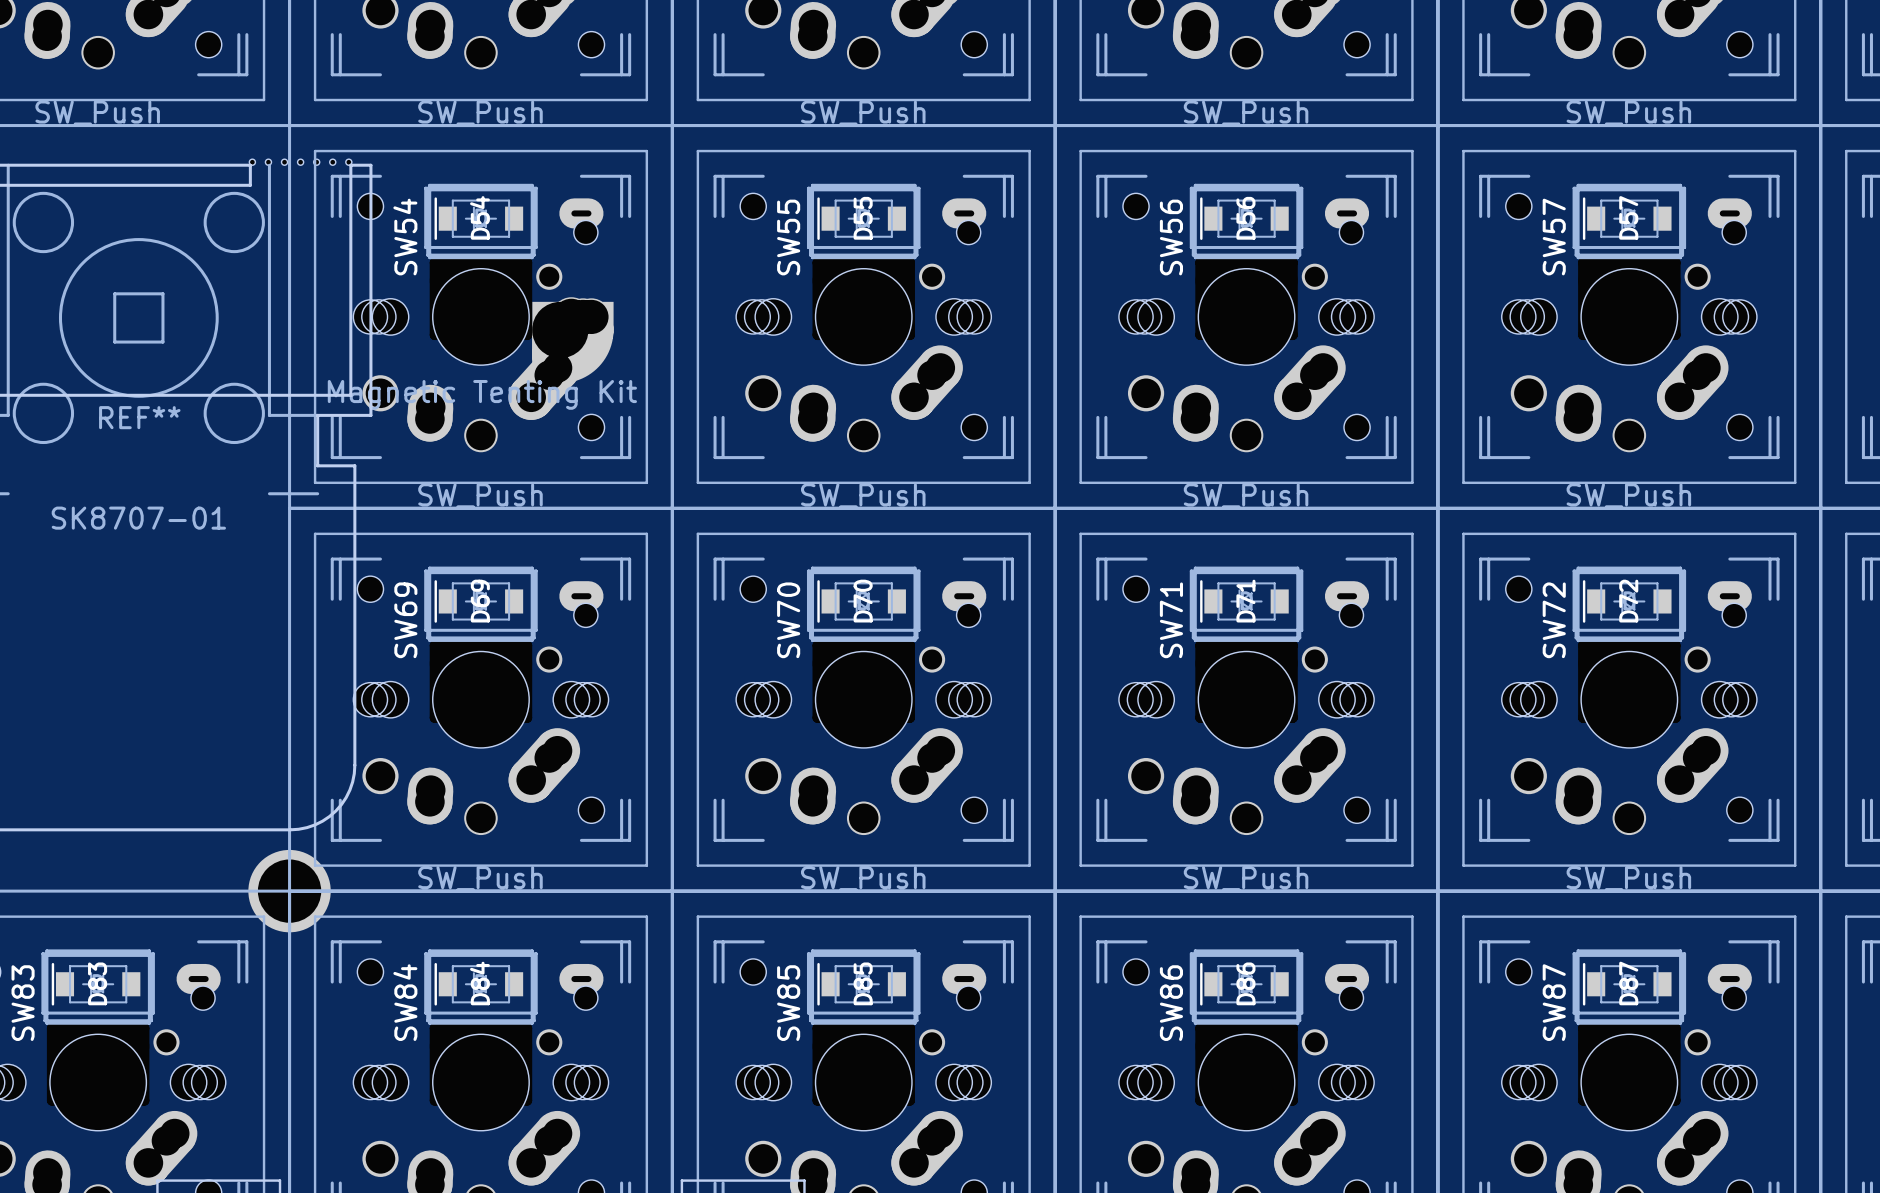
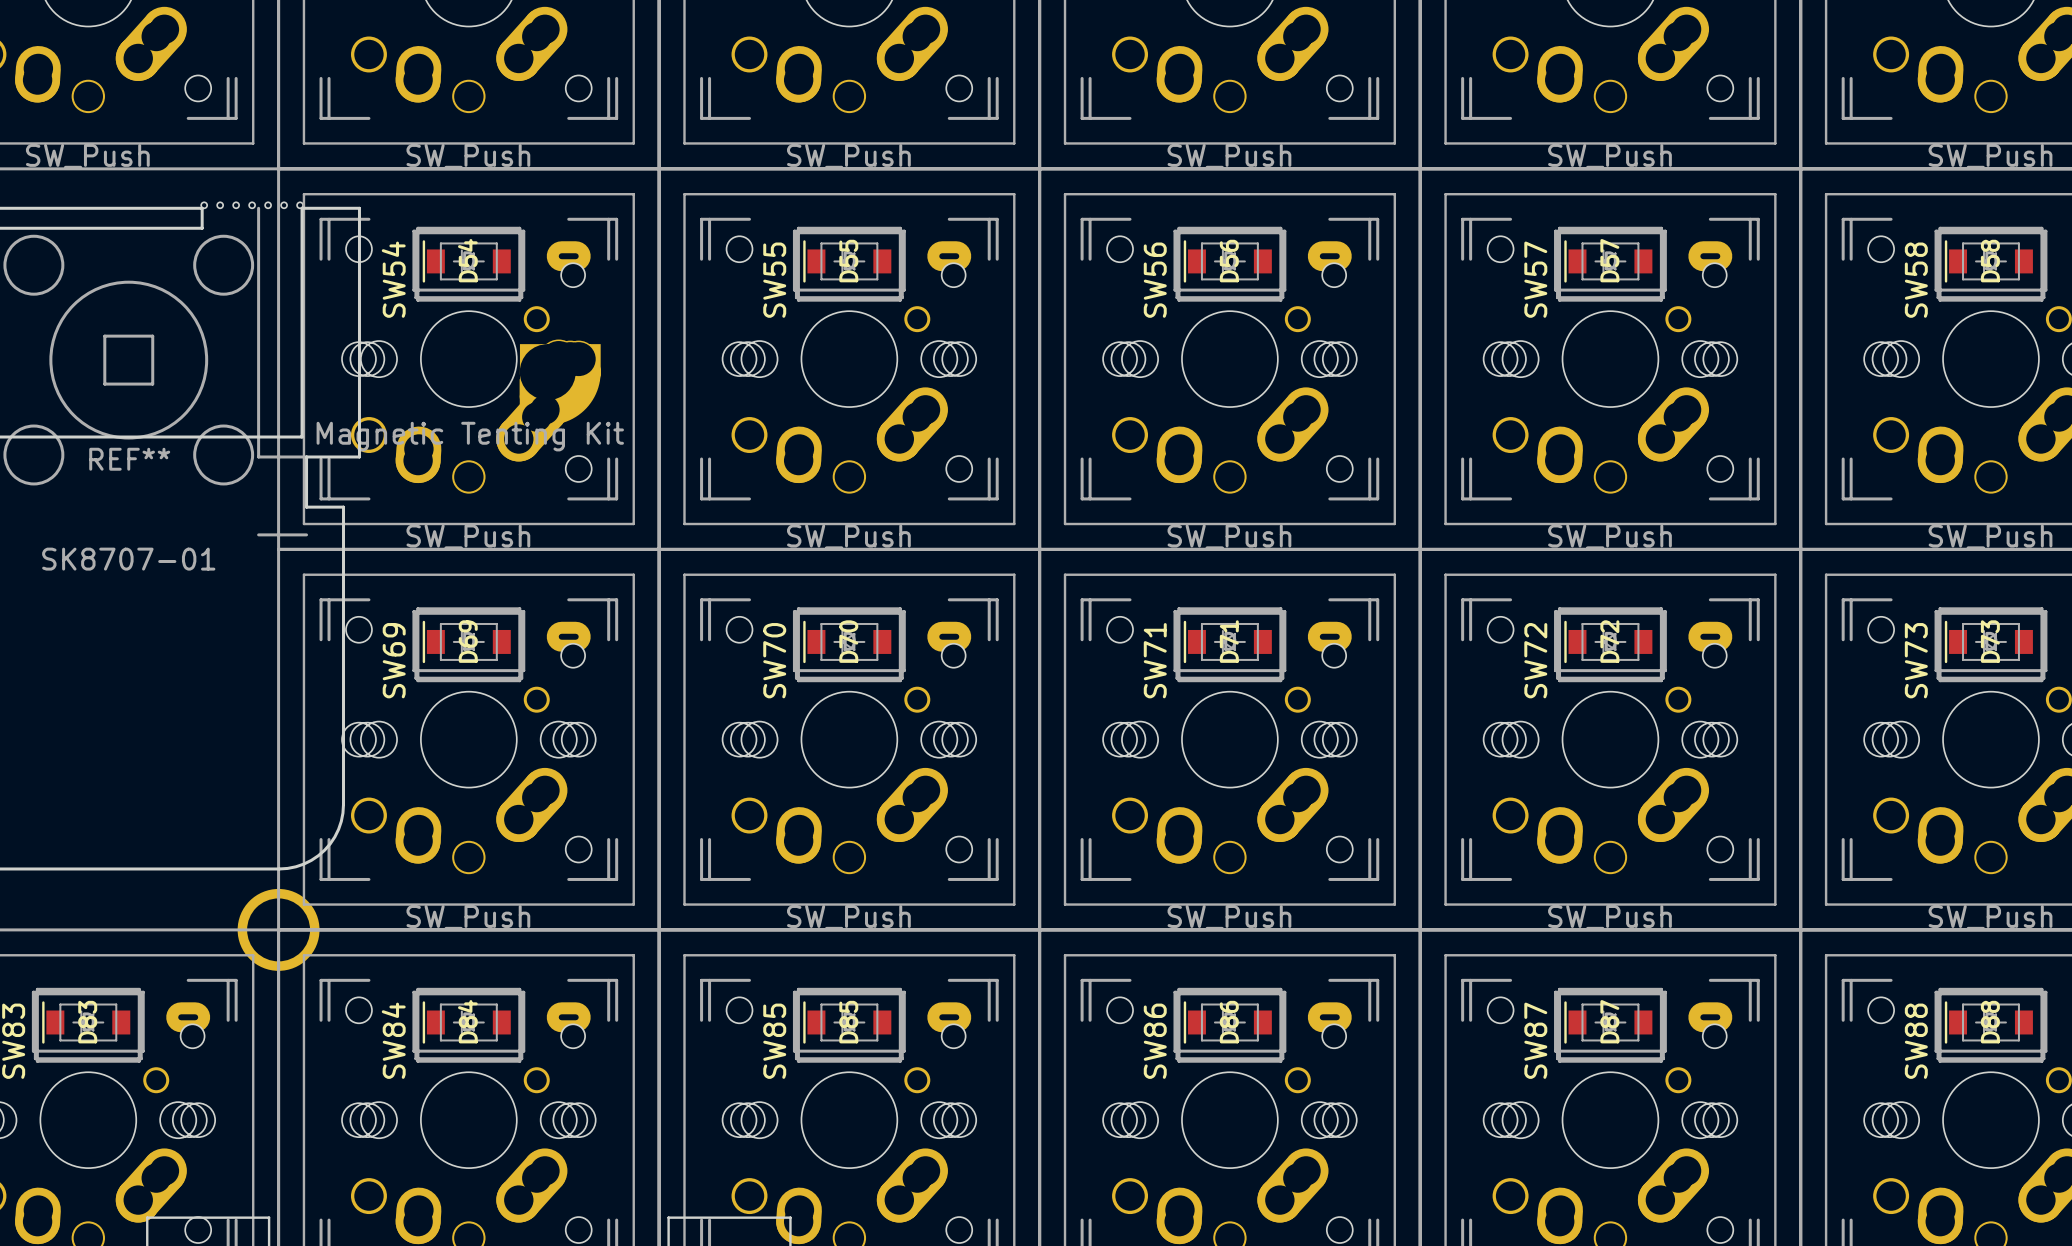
part position: (300, 162) -> (252, 205)
board edge: (212, 165) (250, 165) (250, 185) (212, 185) -> (202, 208) (202, 228)
board edge: (350, 165) (350, 395) (313, 395) -> (339, 208) (302, 208) (302, 437)

